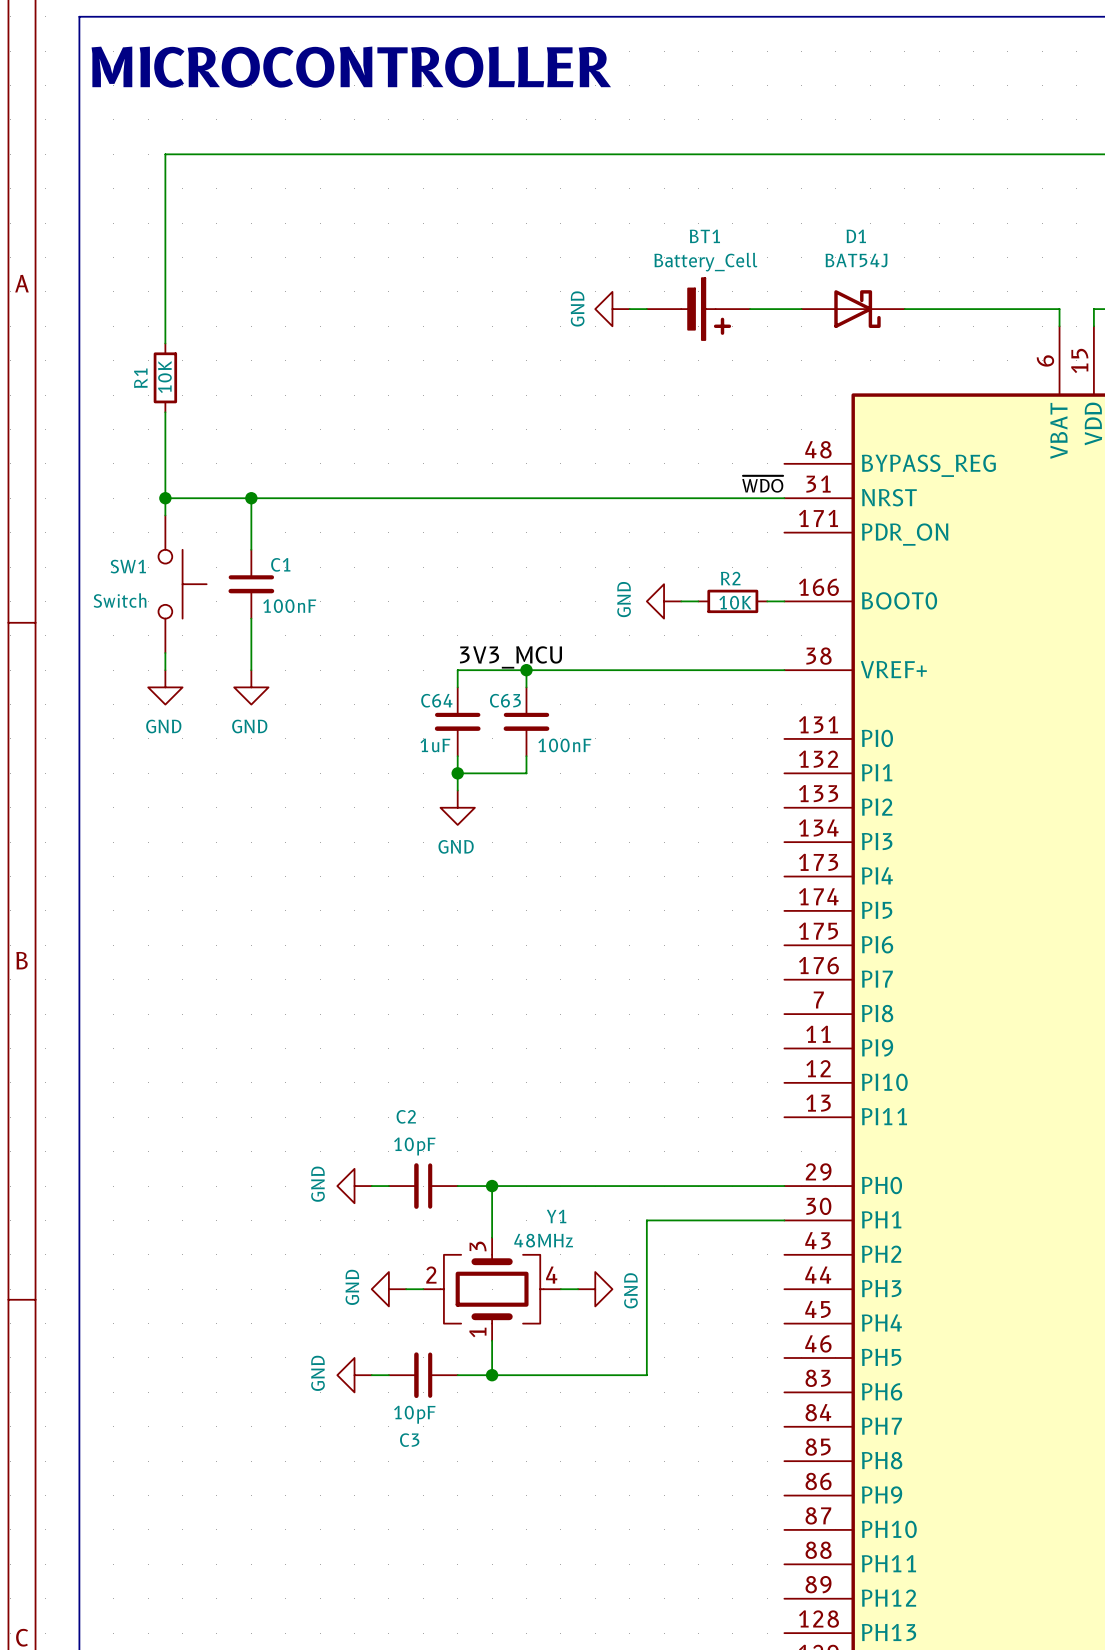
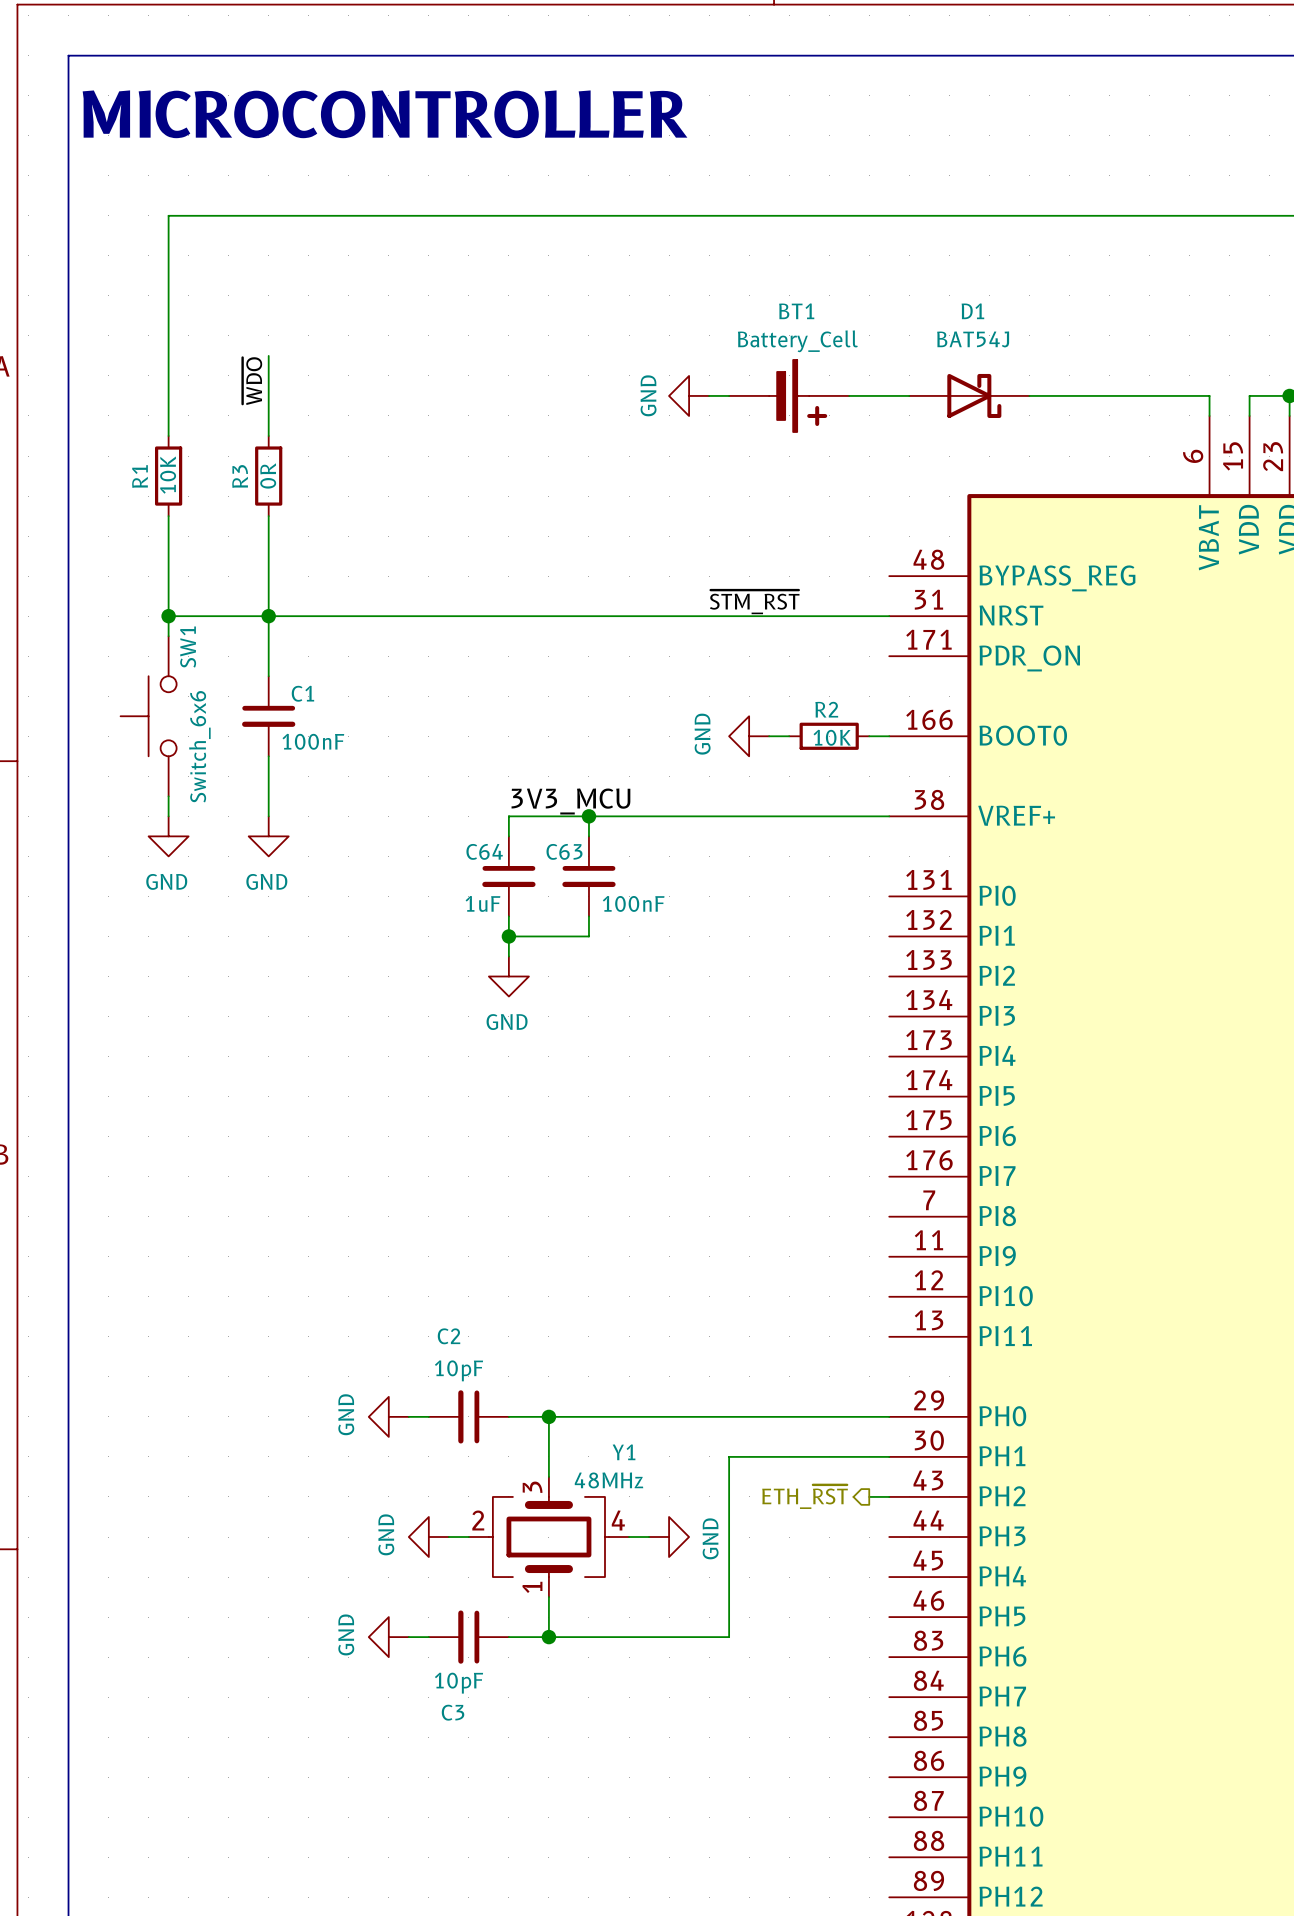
wire: none -> (268, 355) (268, 436)
label: none -> ~{WDO} (252, 381)
R3: none -> 0R (268, 476)
wire: none -> (268, 516) (268, 616)
label: ~{WDO} (762, 484) -> none
label: none -> ~{STM_RST} (754, 602)
SW1 name position: SW1 (128, 566) -> SW1 (188, 647)
SW1 rotation: 0° (182, 584) -> 180° (148, 716)
SW1 value: Switch (120, 600) -> Switch_6x6 (199, 746)
hierarchical label: none -> ETH_~{RST} (805, 1496)
wire: none -> (869, 1496) (889, 1496)

